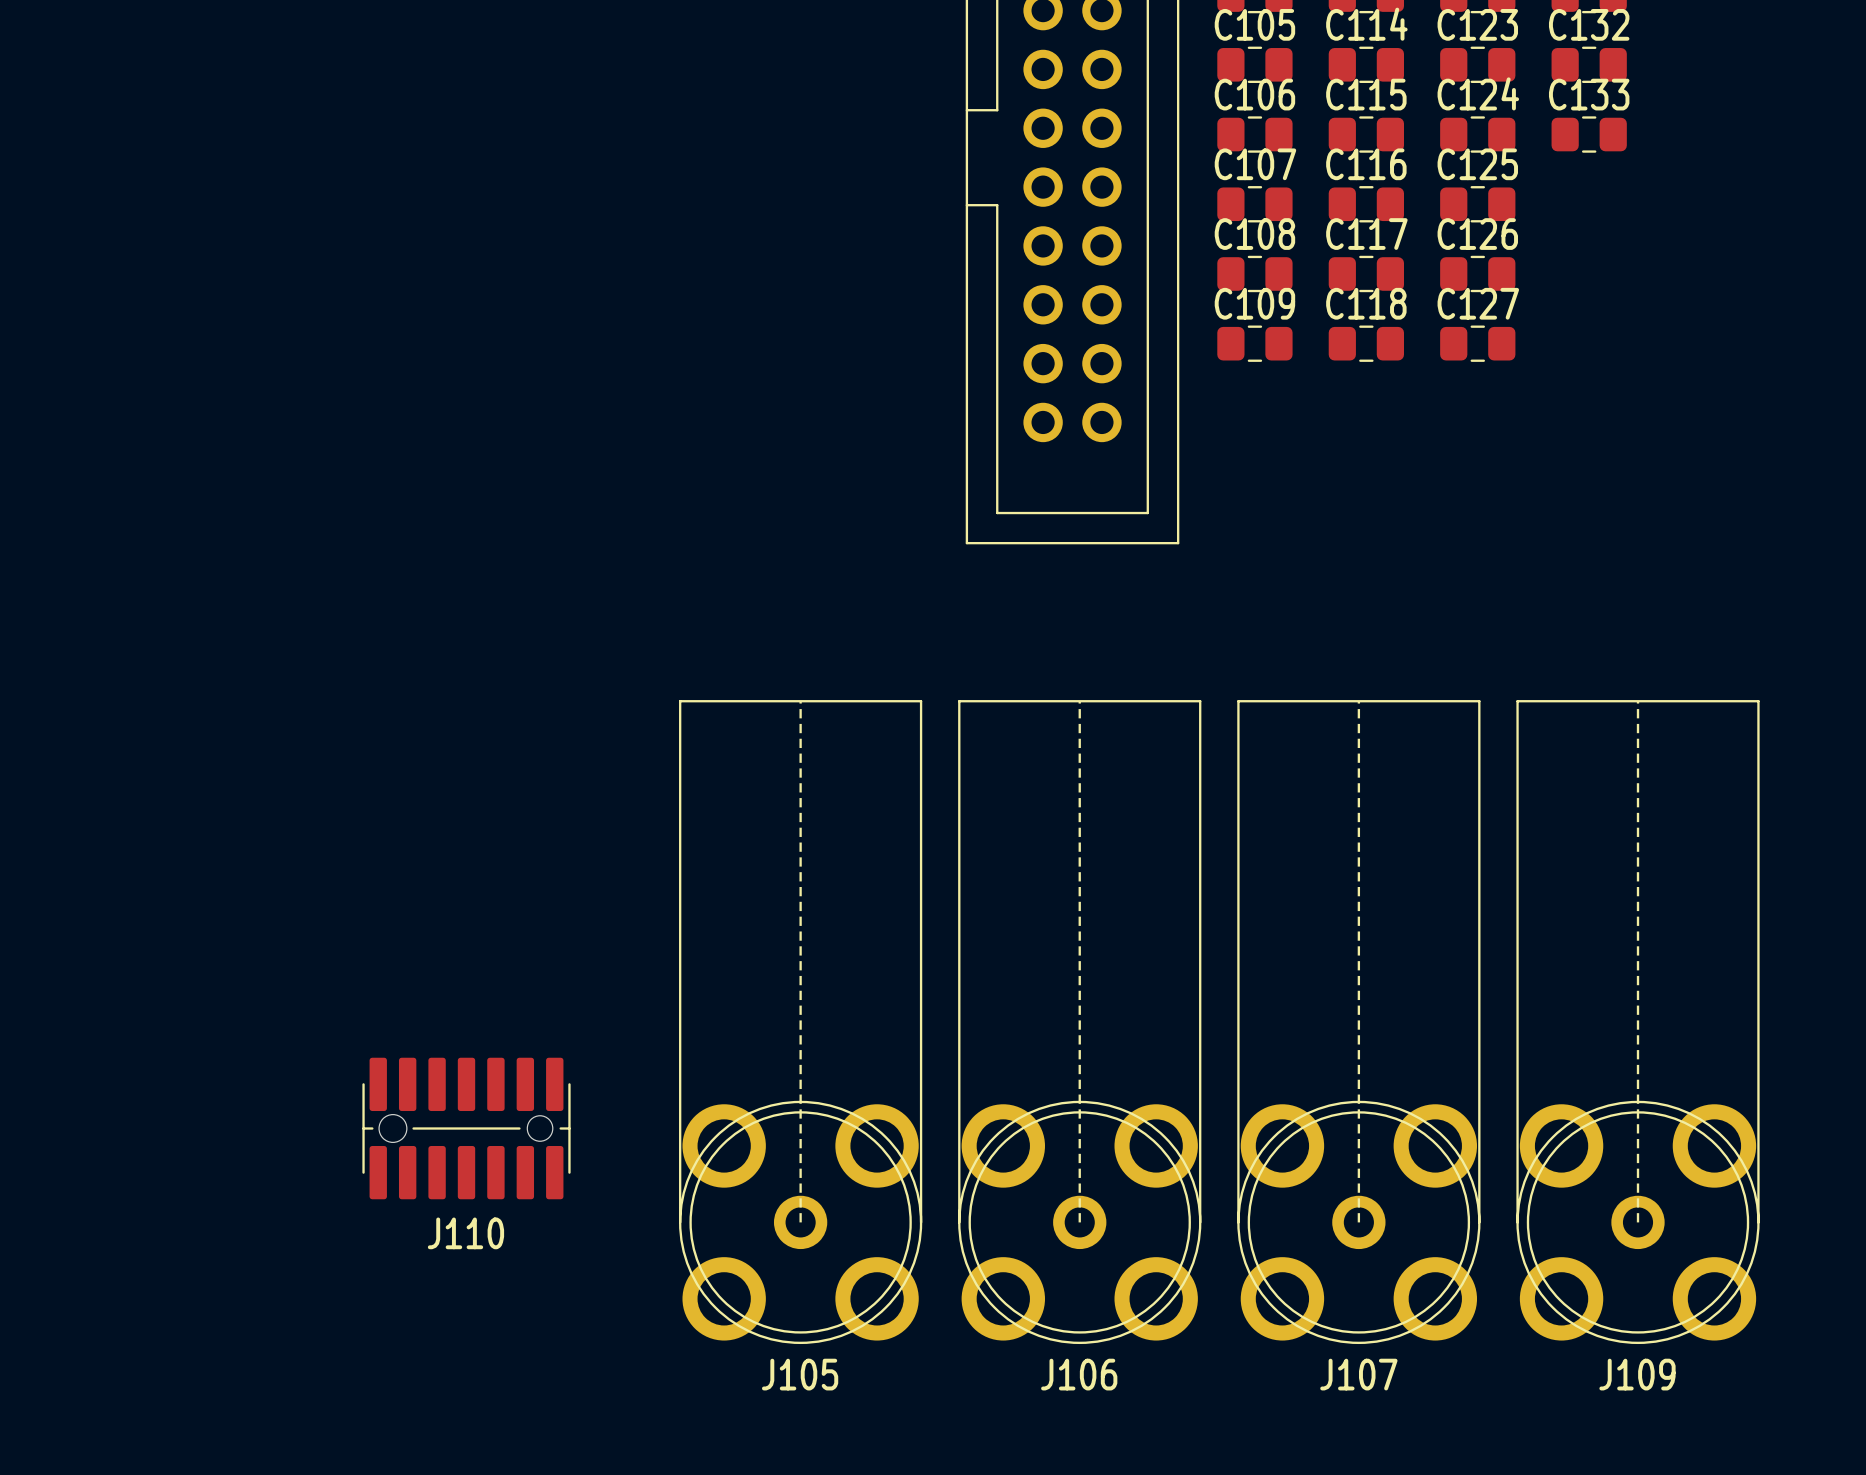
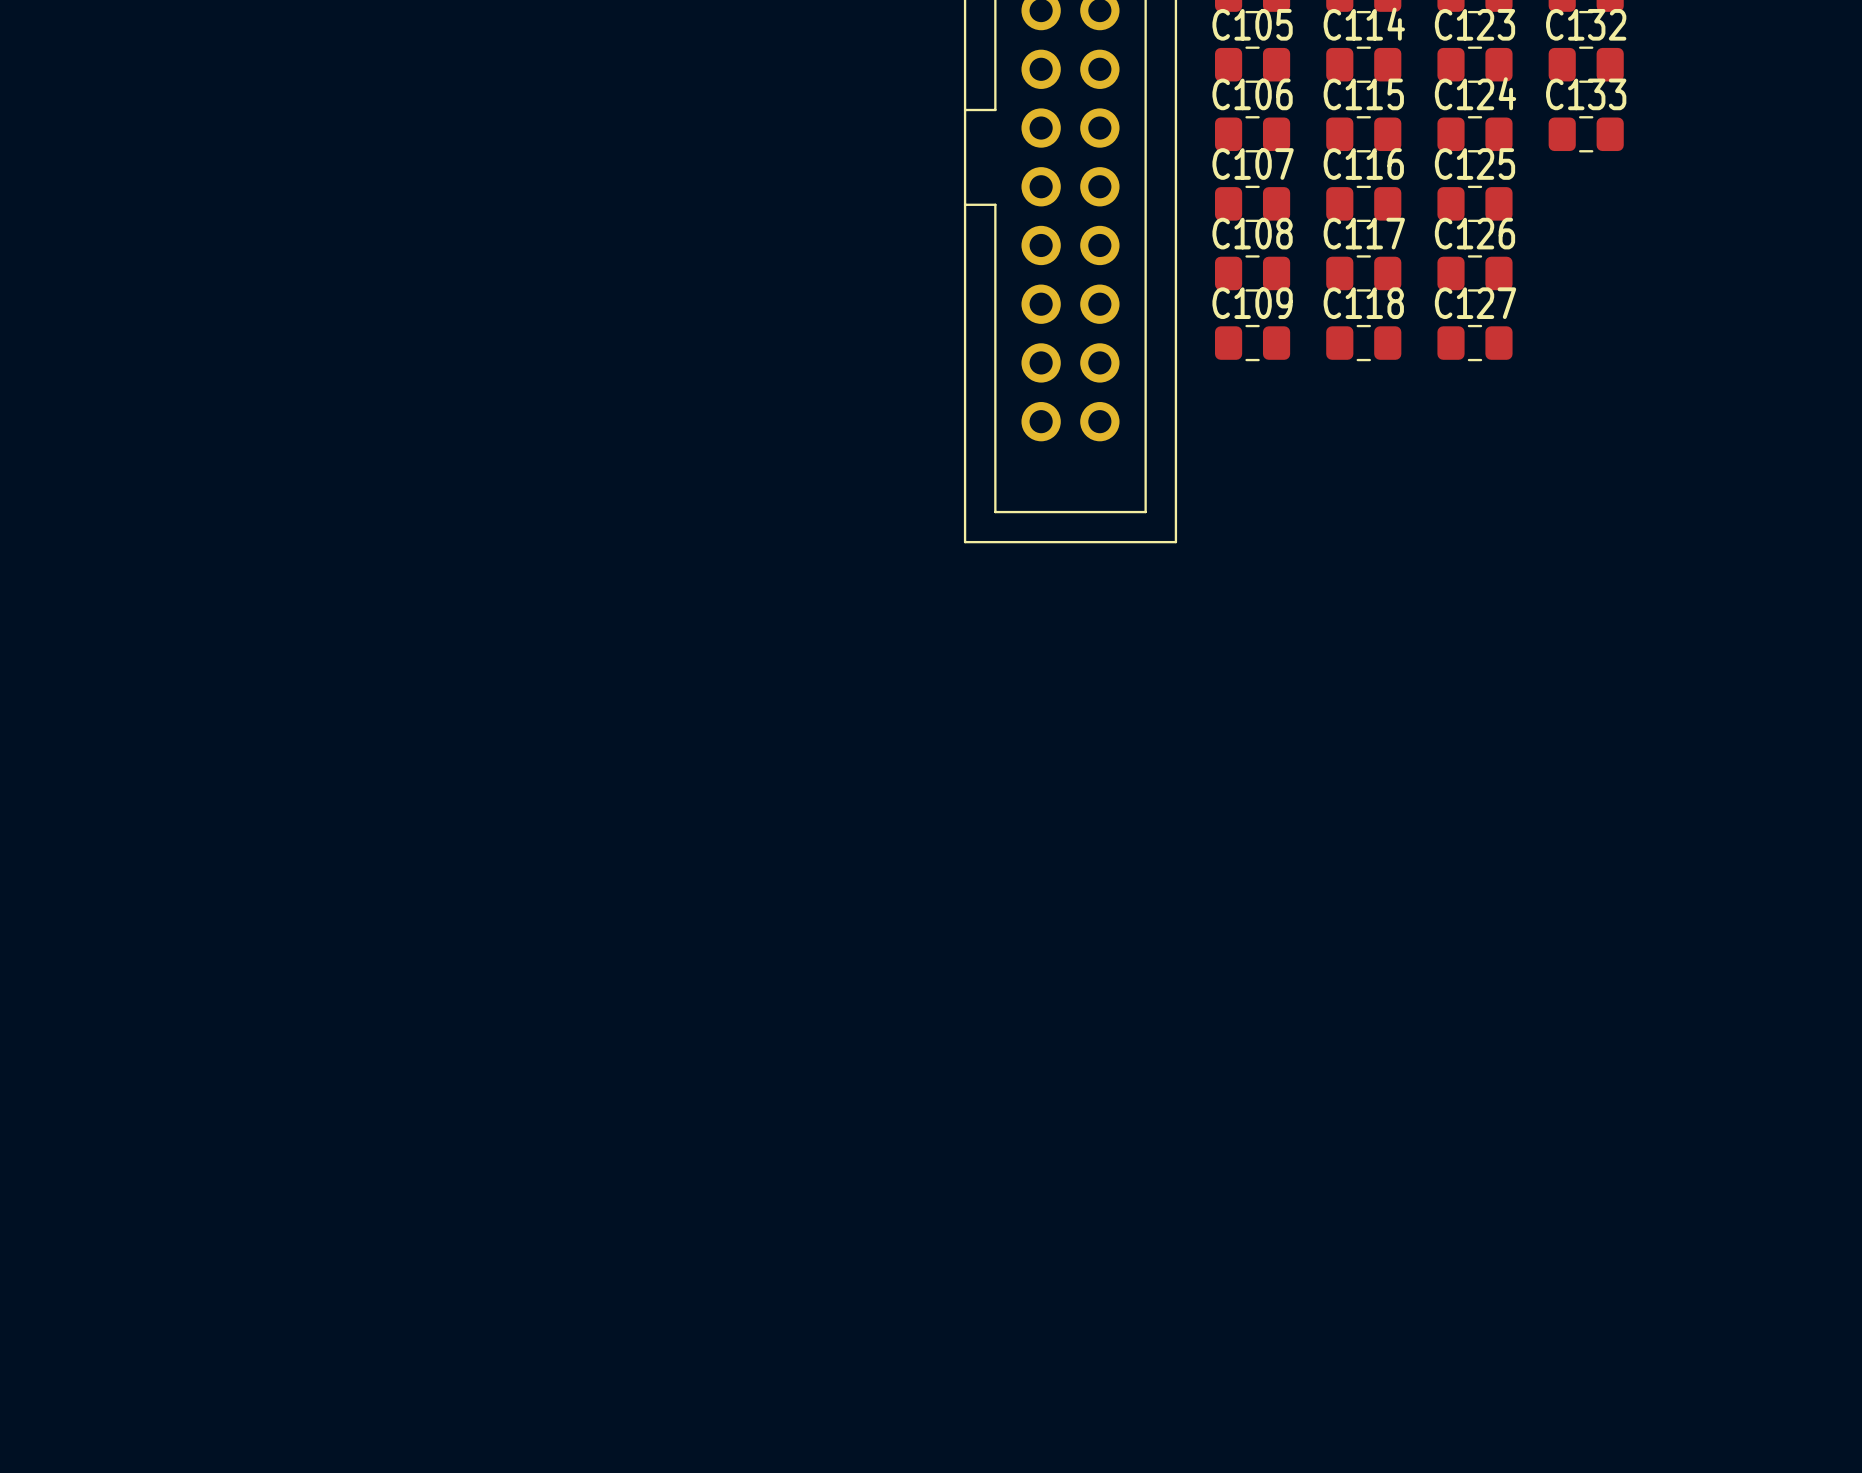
J105: (800, 1022) -> none
J106: (1079, 1022) -> none
J107: (1358, 1022) -> none
J109: (1638, 1022) -> none
J110: (466, 1128) -> none

